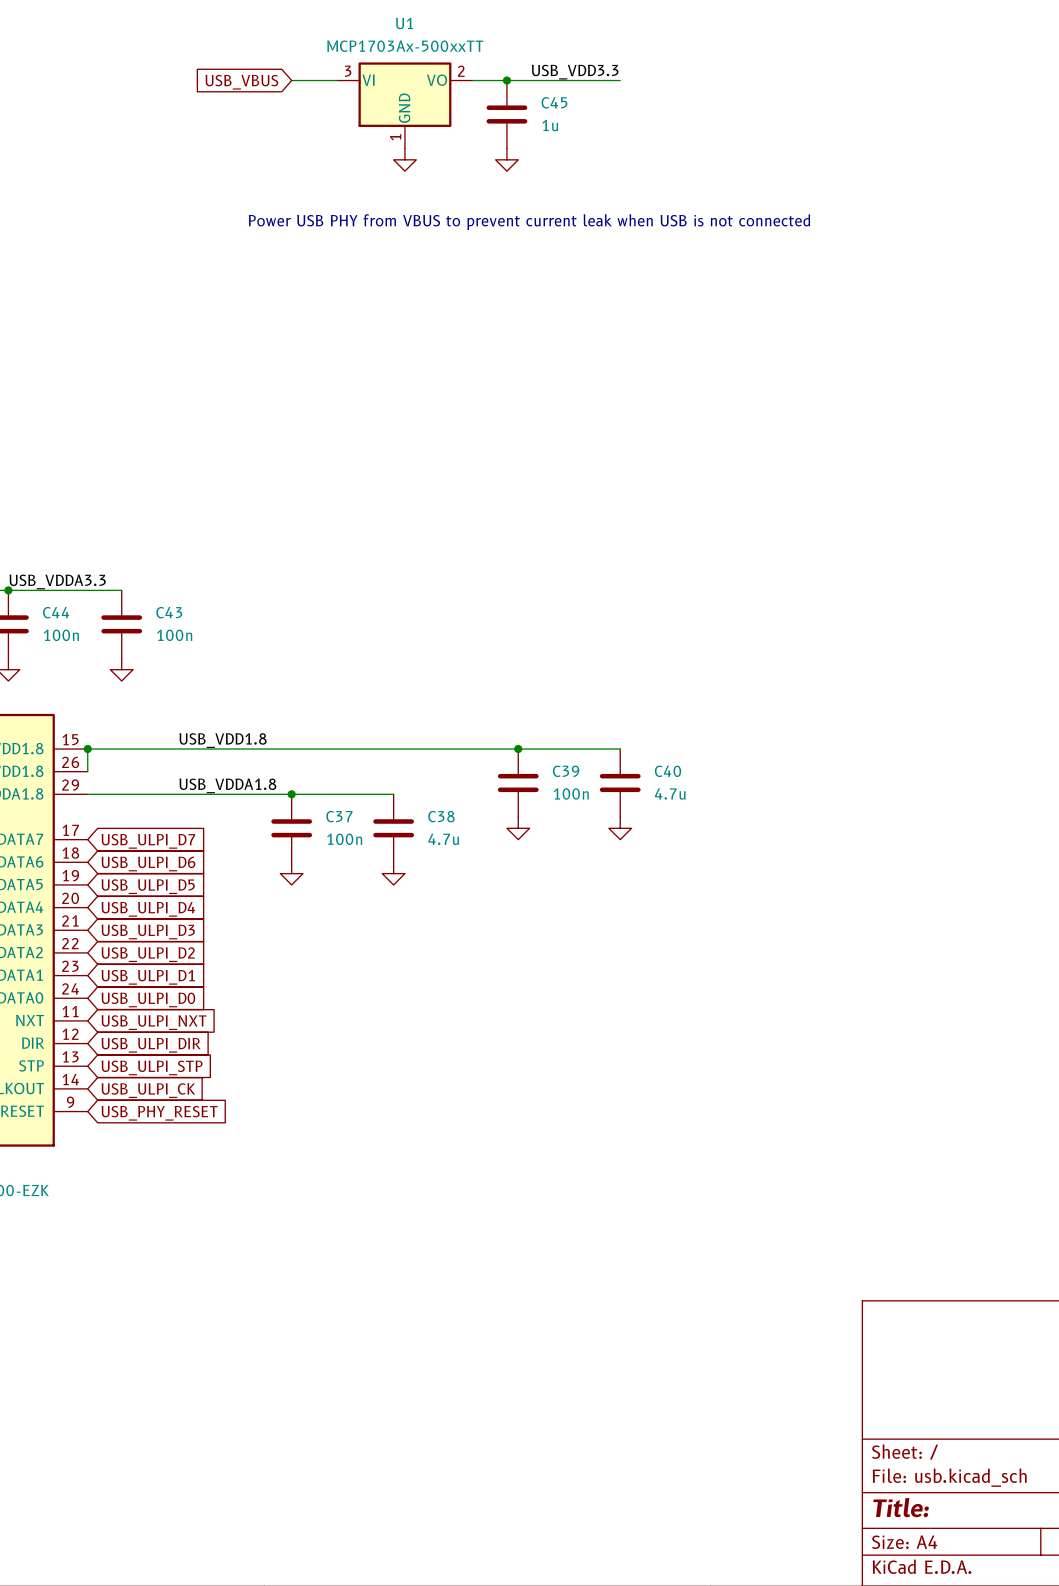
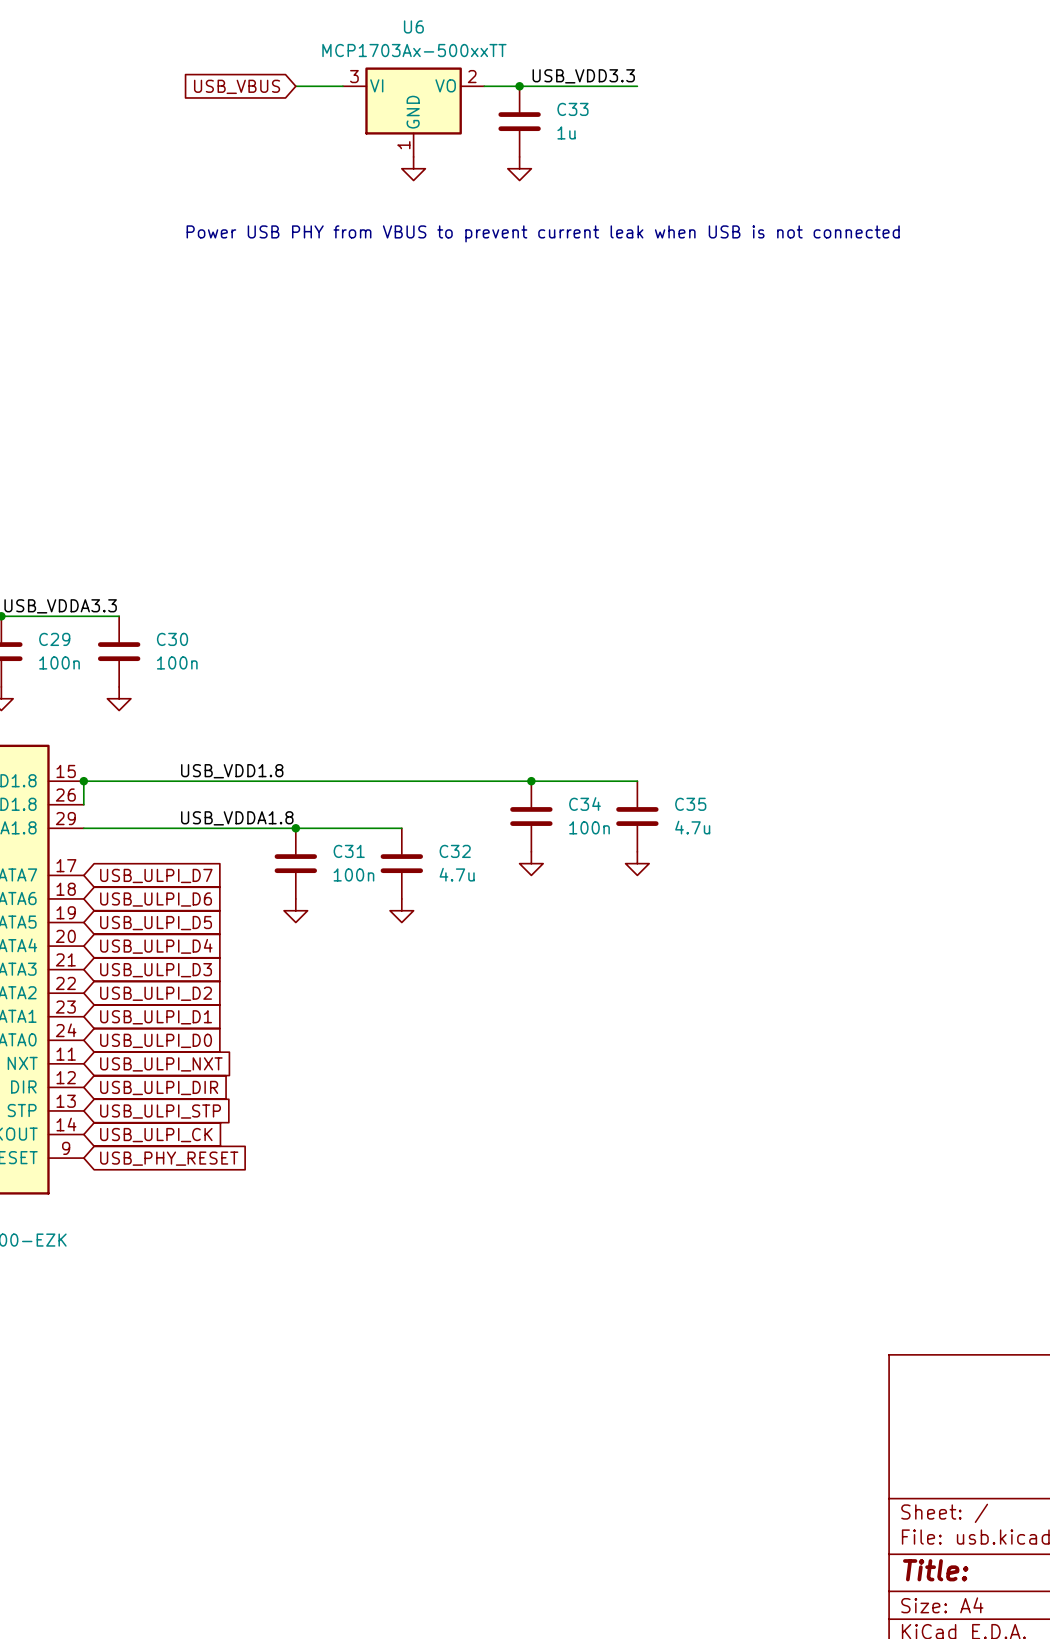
U1 name: U1 (404, 23) -> U6 (413, 26)
C45 name: C45 (554, 102) -> C33 (572, 109)
C44 name: C44 (56, 612) -> C29 (54, 639)
C43 name: C43 (169, 612) -> C30 (172, 639)
C39 name: C39 (566, 771) -> C34 (585, 804)
C40 name: C40 (668, 771) -> C35 (690, 804)
C37 name: C37 (339, 816) -> C31 (349, 851)
C38 name: C38 (441, 816) -> C32 (455, 851)

